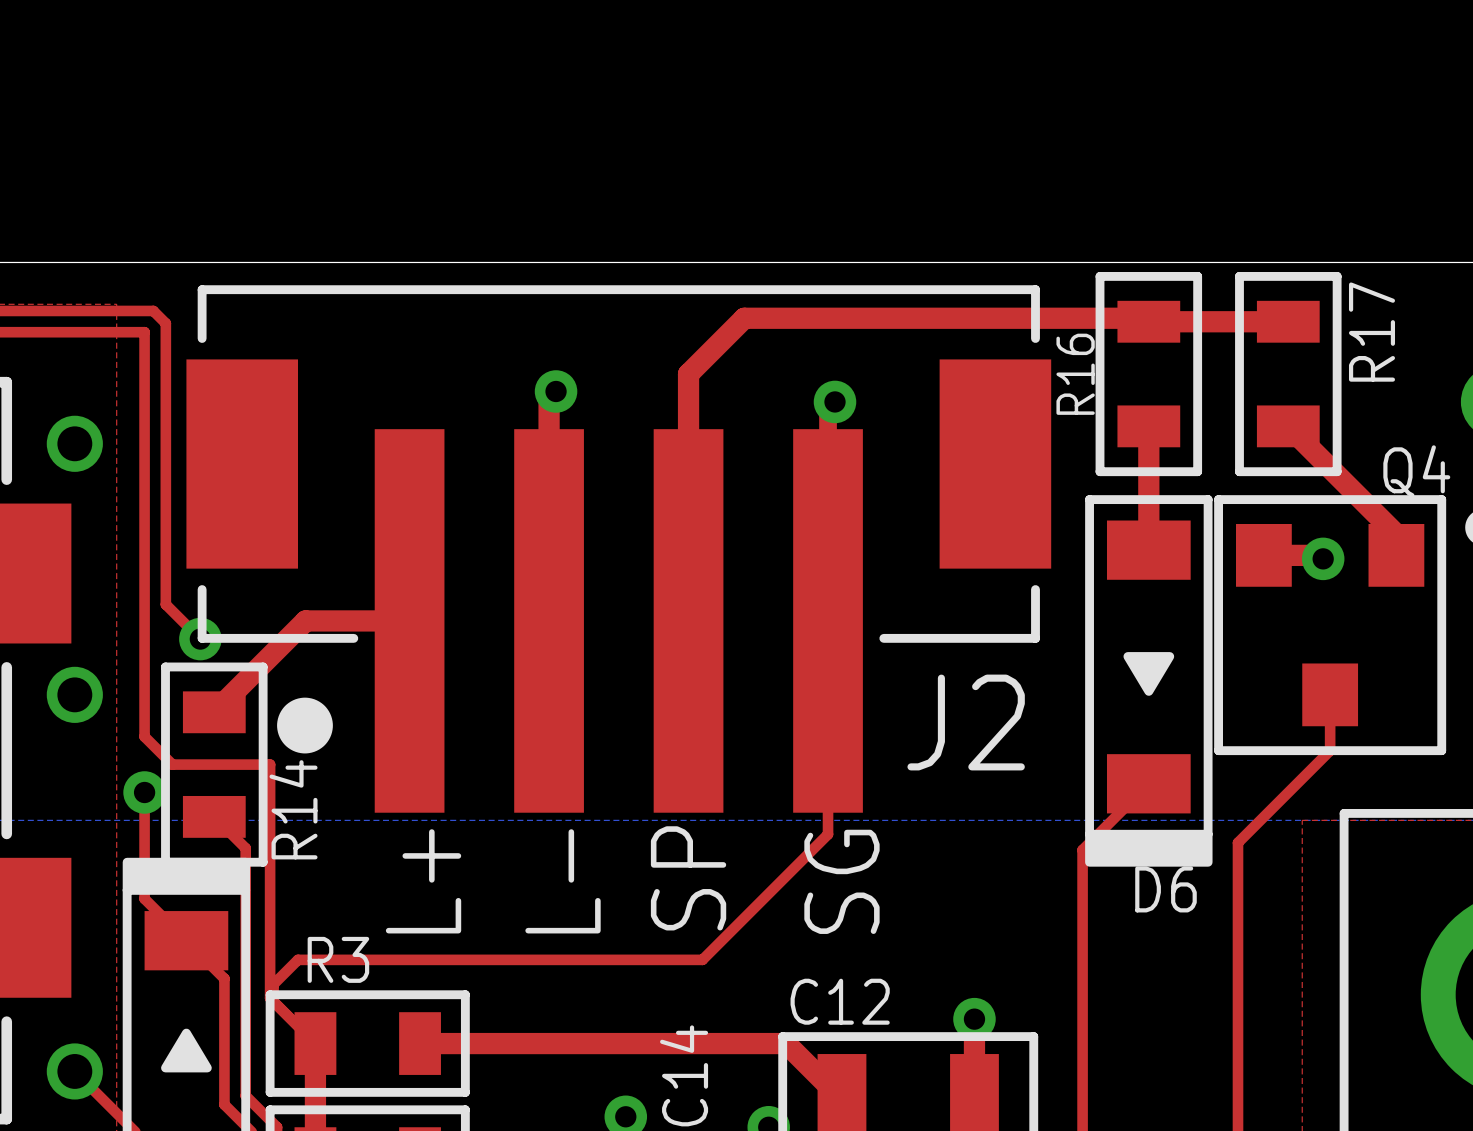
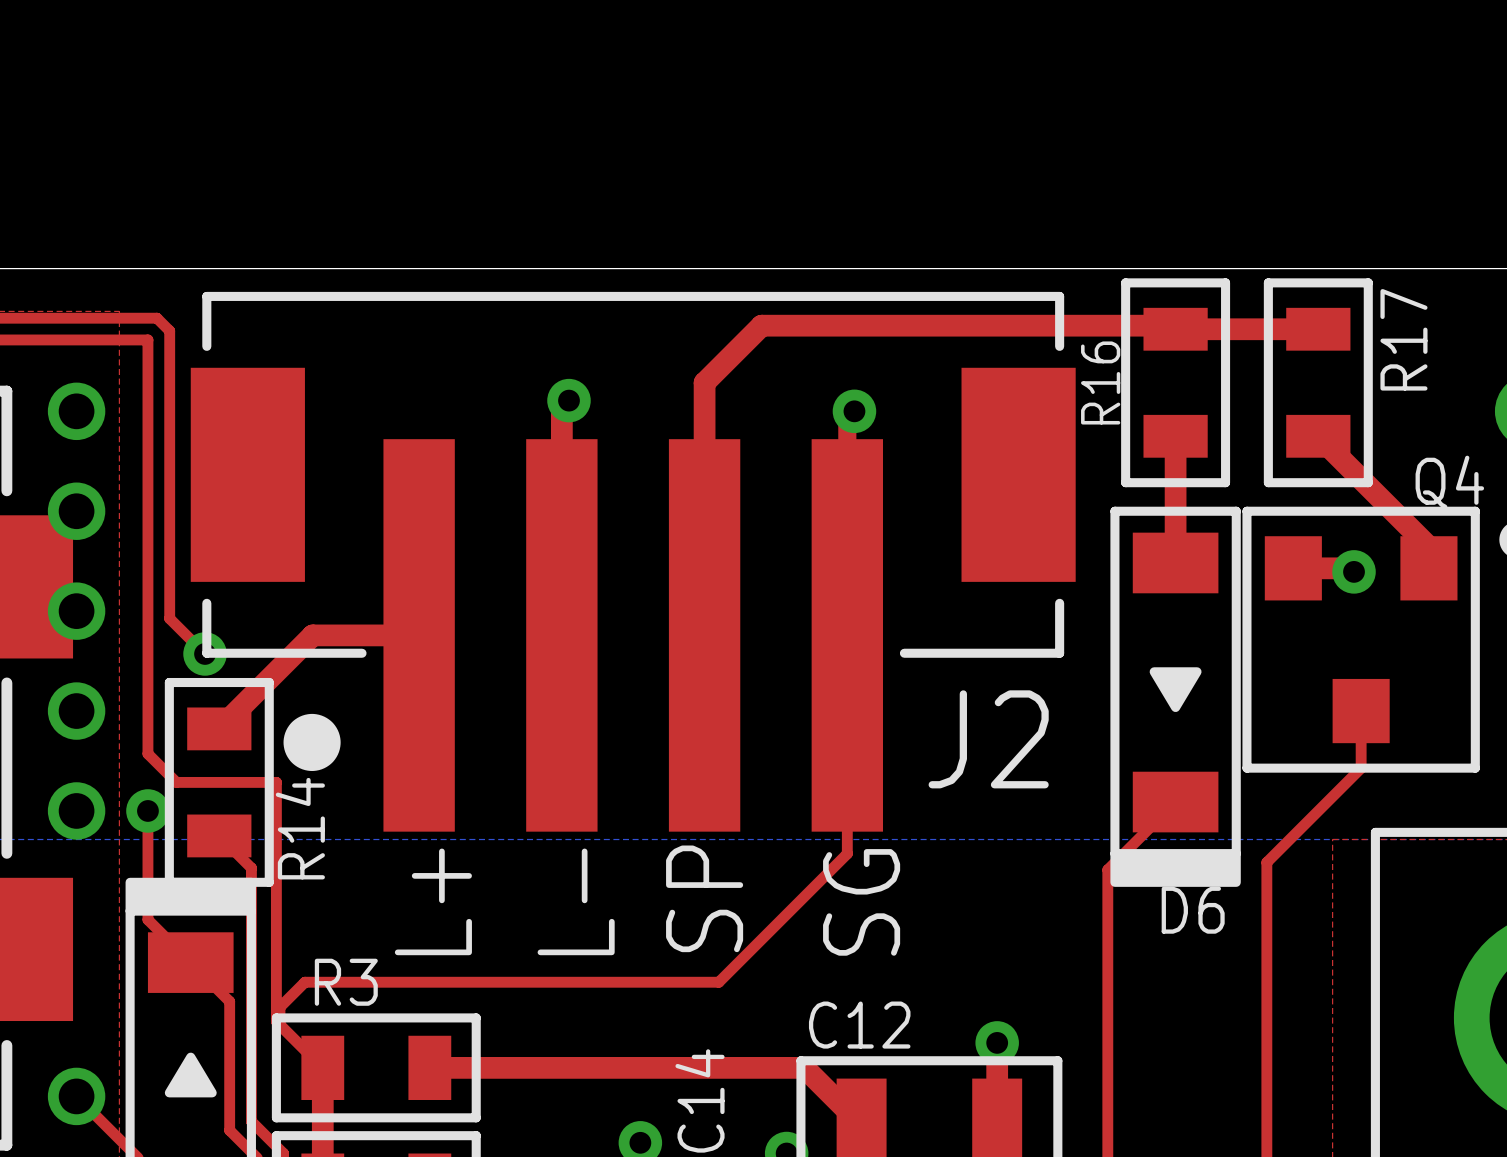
via: none -> (76, 411)
via: (74, 443) -> none
via: none -> (76, 511)
via: none -> (76, 611)
via: none -> (76, 810)

